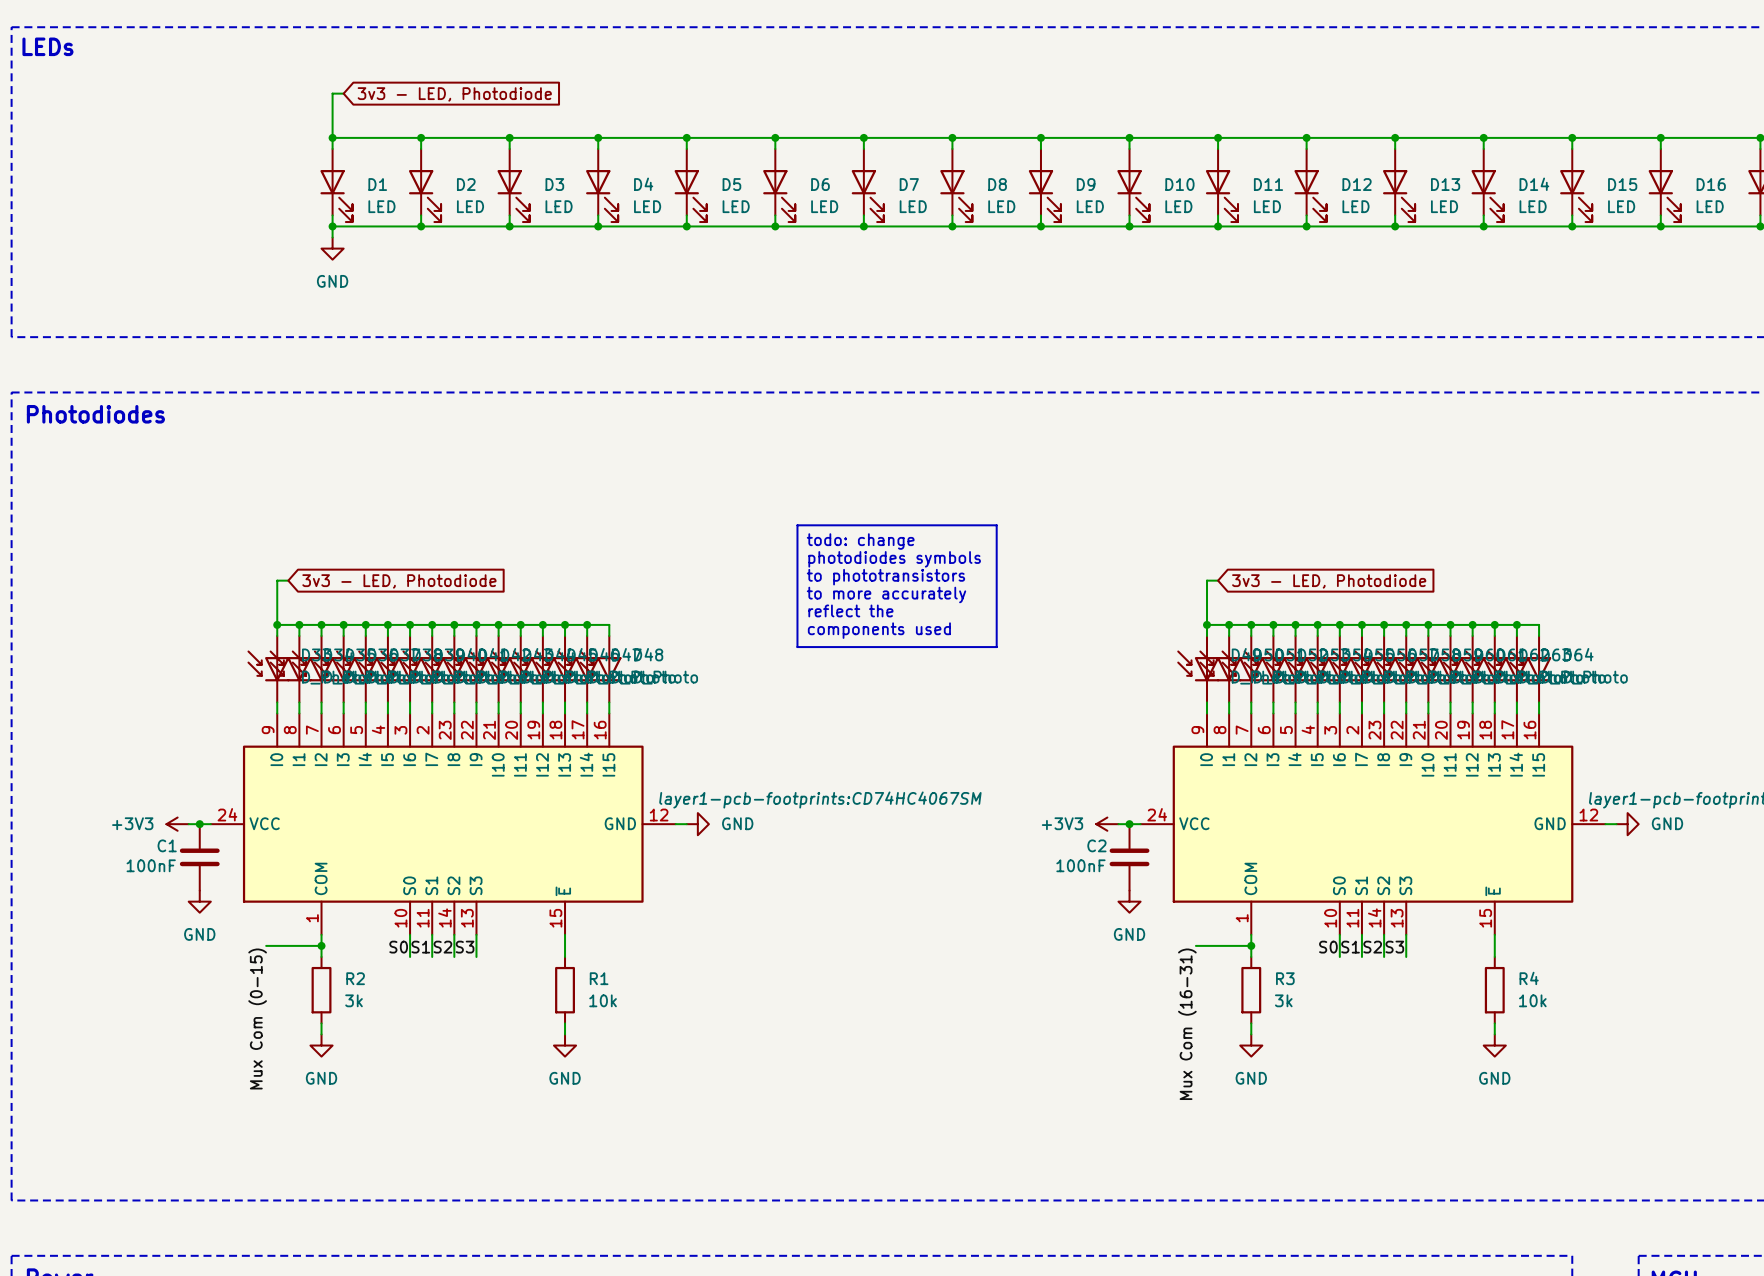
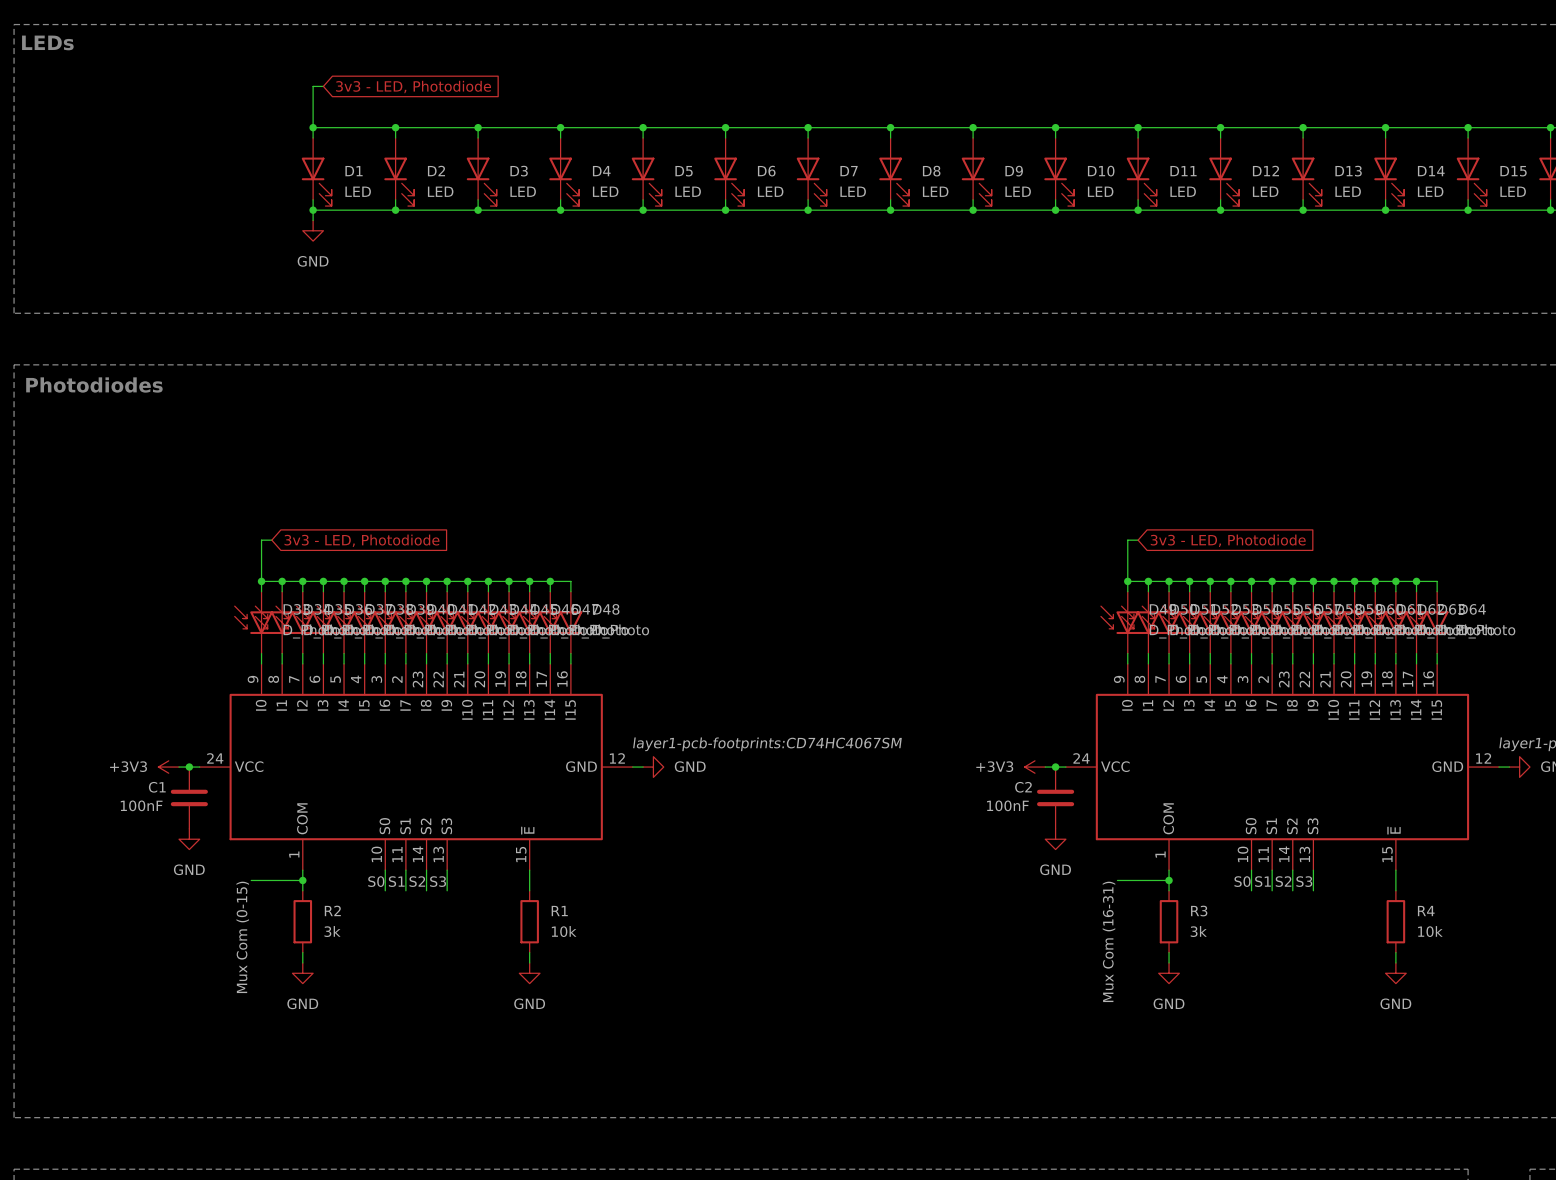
line: (797, 525) (996, 525) (996, 647) (797, 647) (797, 525) -> none
text: todo: change (860, 541) -> none
text: photodiodes symbols (894, 559) -> none
text: to phototransistors (885, 577) -> none
text: to more accurately (886, 594) -> none
text: reflect the (850, 610) -> none
text: components used (879, 630) -> none

